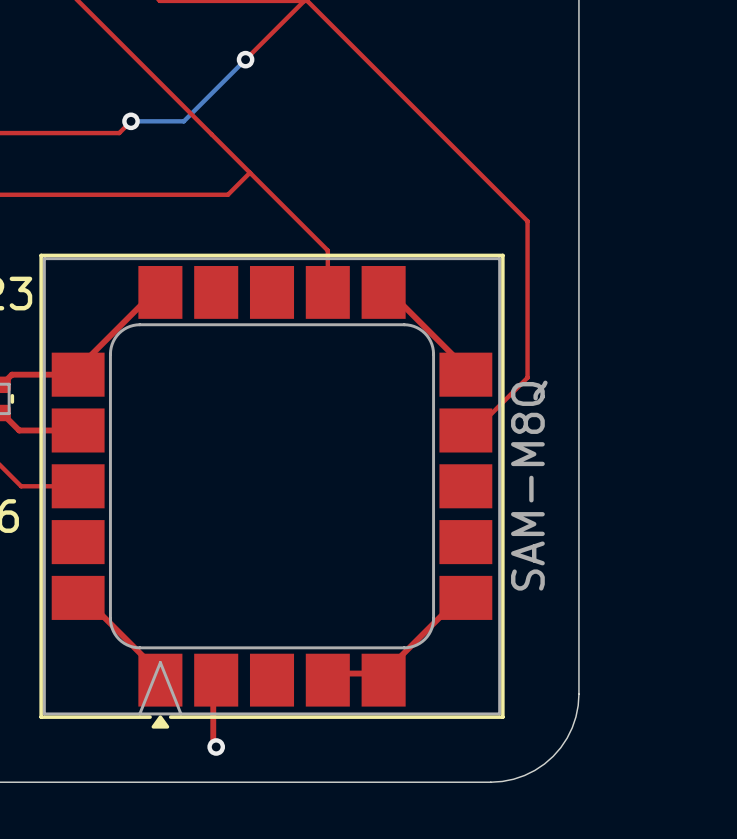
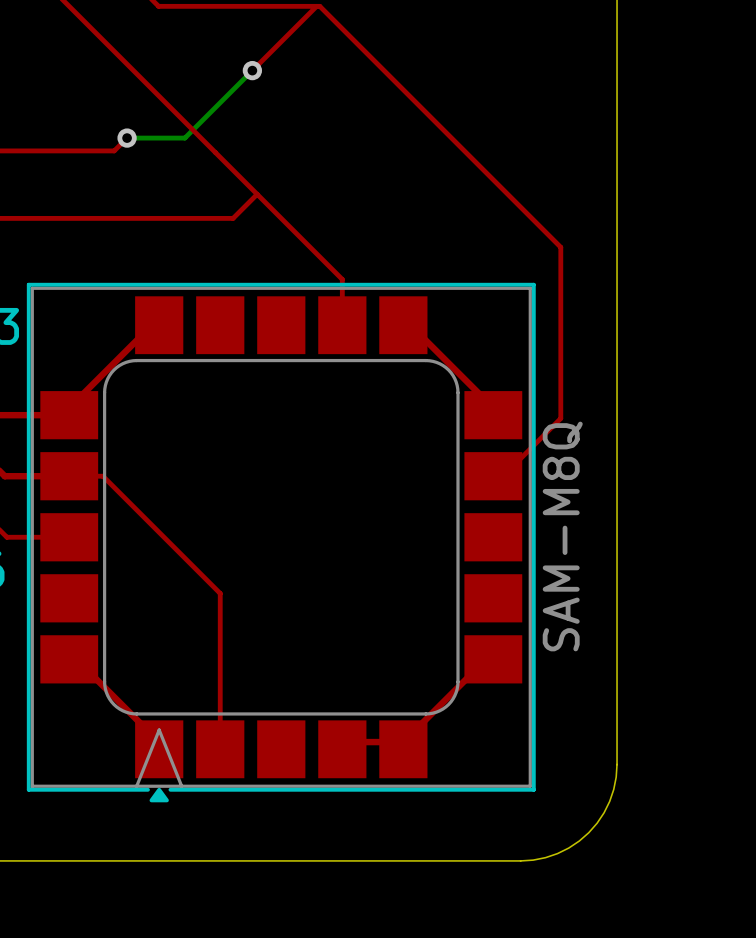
top track: none -> (69, 476) (102, 476) (220, 593) (220, 749)
top track: (213, 683) (213, 744) (216, 746) -> none
via: (216, 746) -> none

